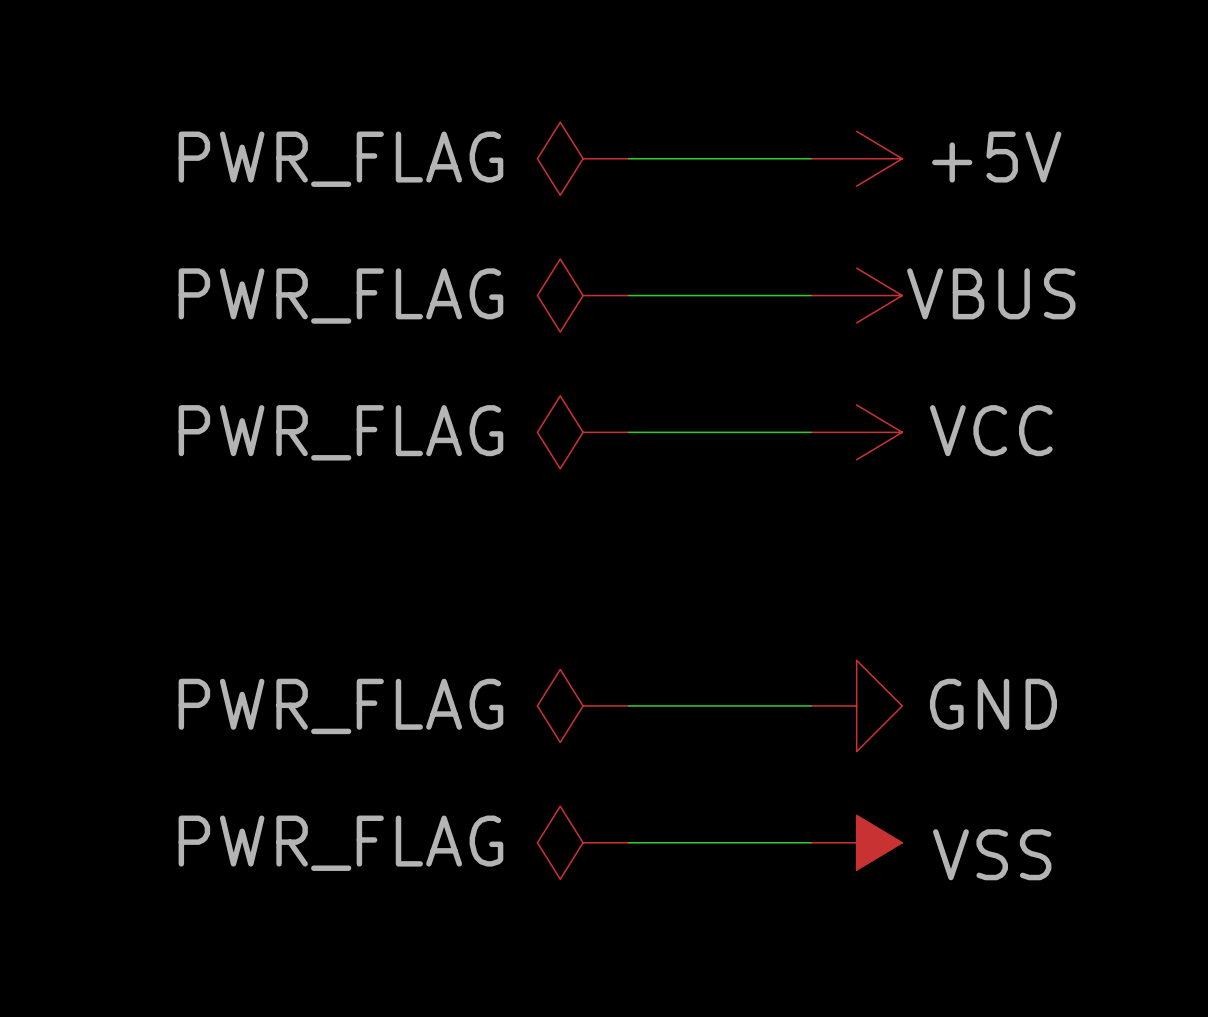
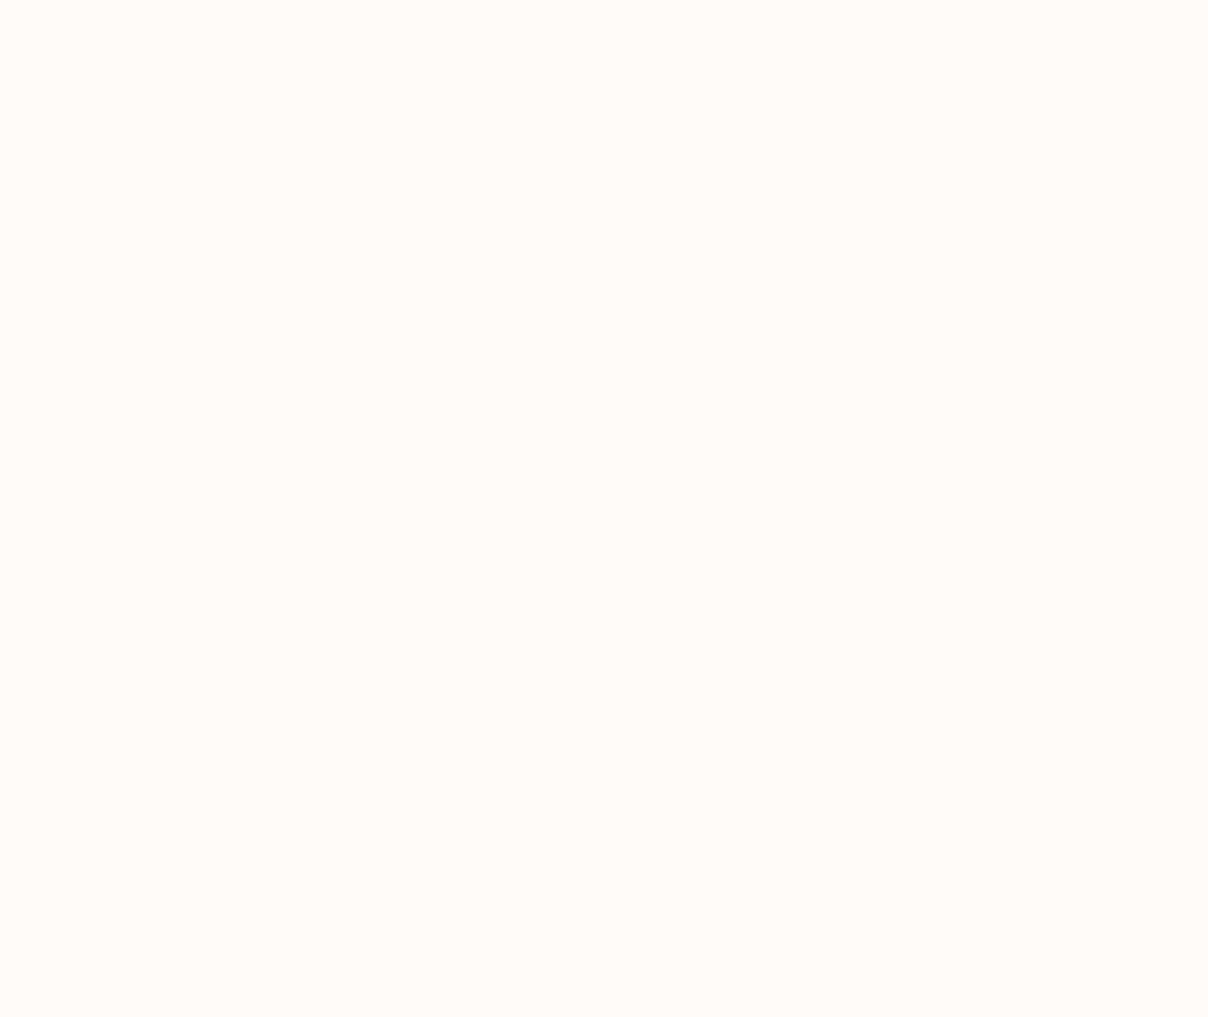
power symbol: PWR_FLAG (583, 158) -> none
wire: (628, 158) (811, 158) -> none
power symbol: +5V (856, 158) -> none
power symbol: PWR_FLAG (583, 295) -> none
wire: (628, 295) (811, 295) -> none
power symbol: VBUS (856, 295) -> none
power symbol: PWR_FLAG (583, 432) -> none
wire: (628, 432) (811, 432) -> none
power symbol: VCC (856, 432) -> none
power symbol: PWR_FLAG (583, 705) -> none
wire: (628, 705) (811, 705) -> none
power symbol: GND (856, 705) -> none
power symbol: PWR_FLAG (583, 842) -> none
wire: (628, 842) (811, 842) -> none
power symbol: VSS (856, 842) -> none

